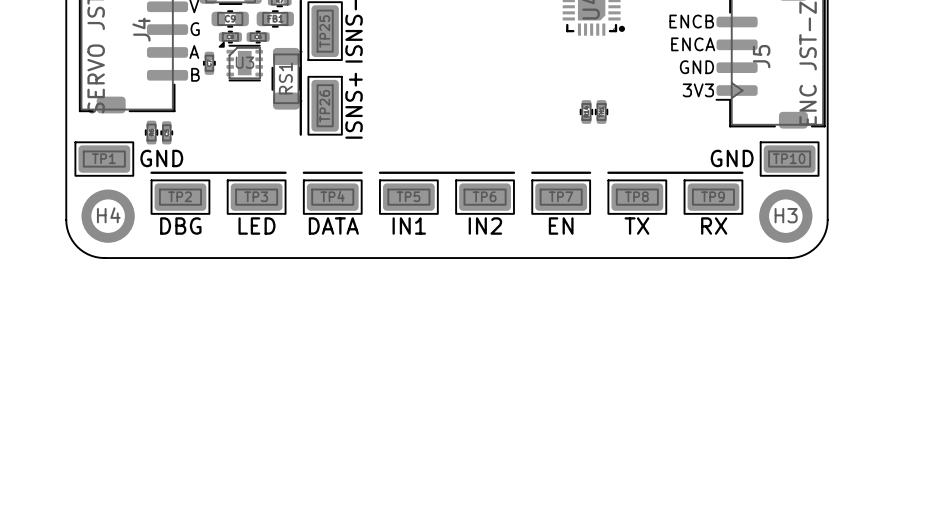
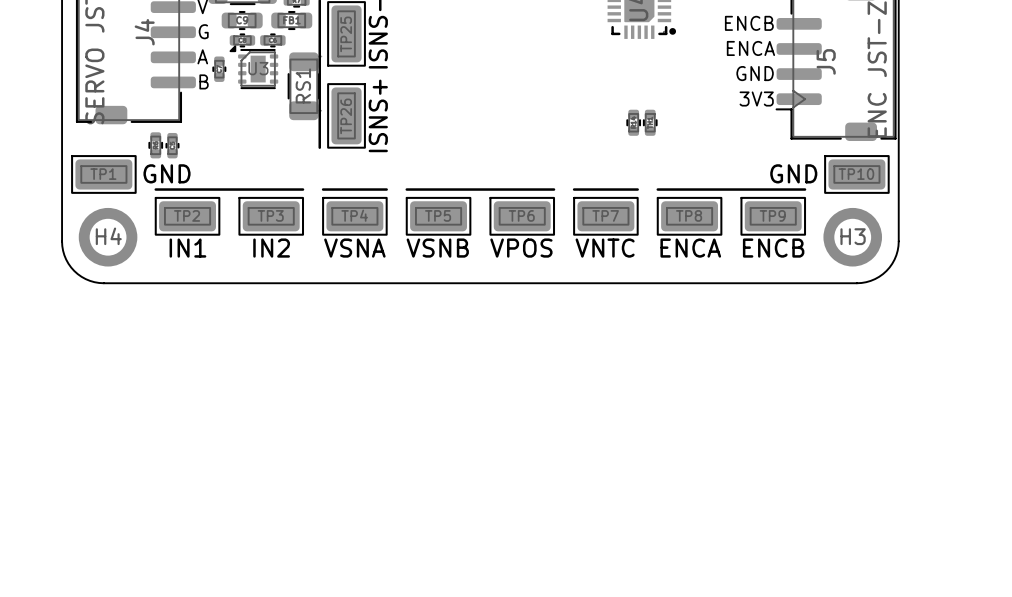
text: DBG (180, 226) -> IN1 (187, 248)
text: LED (256, 226) -> IN2 (271, 248)
text: DATA (333, 226) -> VSNA (354, 248)
text: IN1 (409, 226) -> VSNB (437, 248)
text: IN2 (485, 226) -> VPOS (521, 248)
text: EN (561, 226) -> VNTC (605, 248)
text: TX (636, 226) -> ENCA (690, 248)
text: RX (714, 226) -> ENCB (773, 248)

